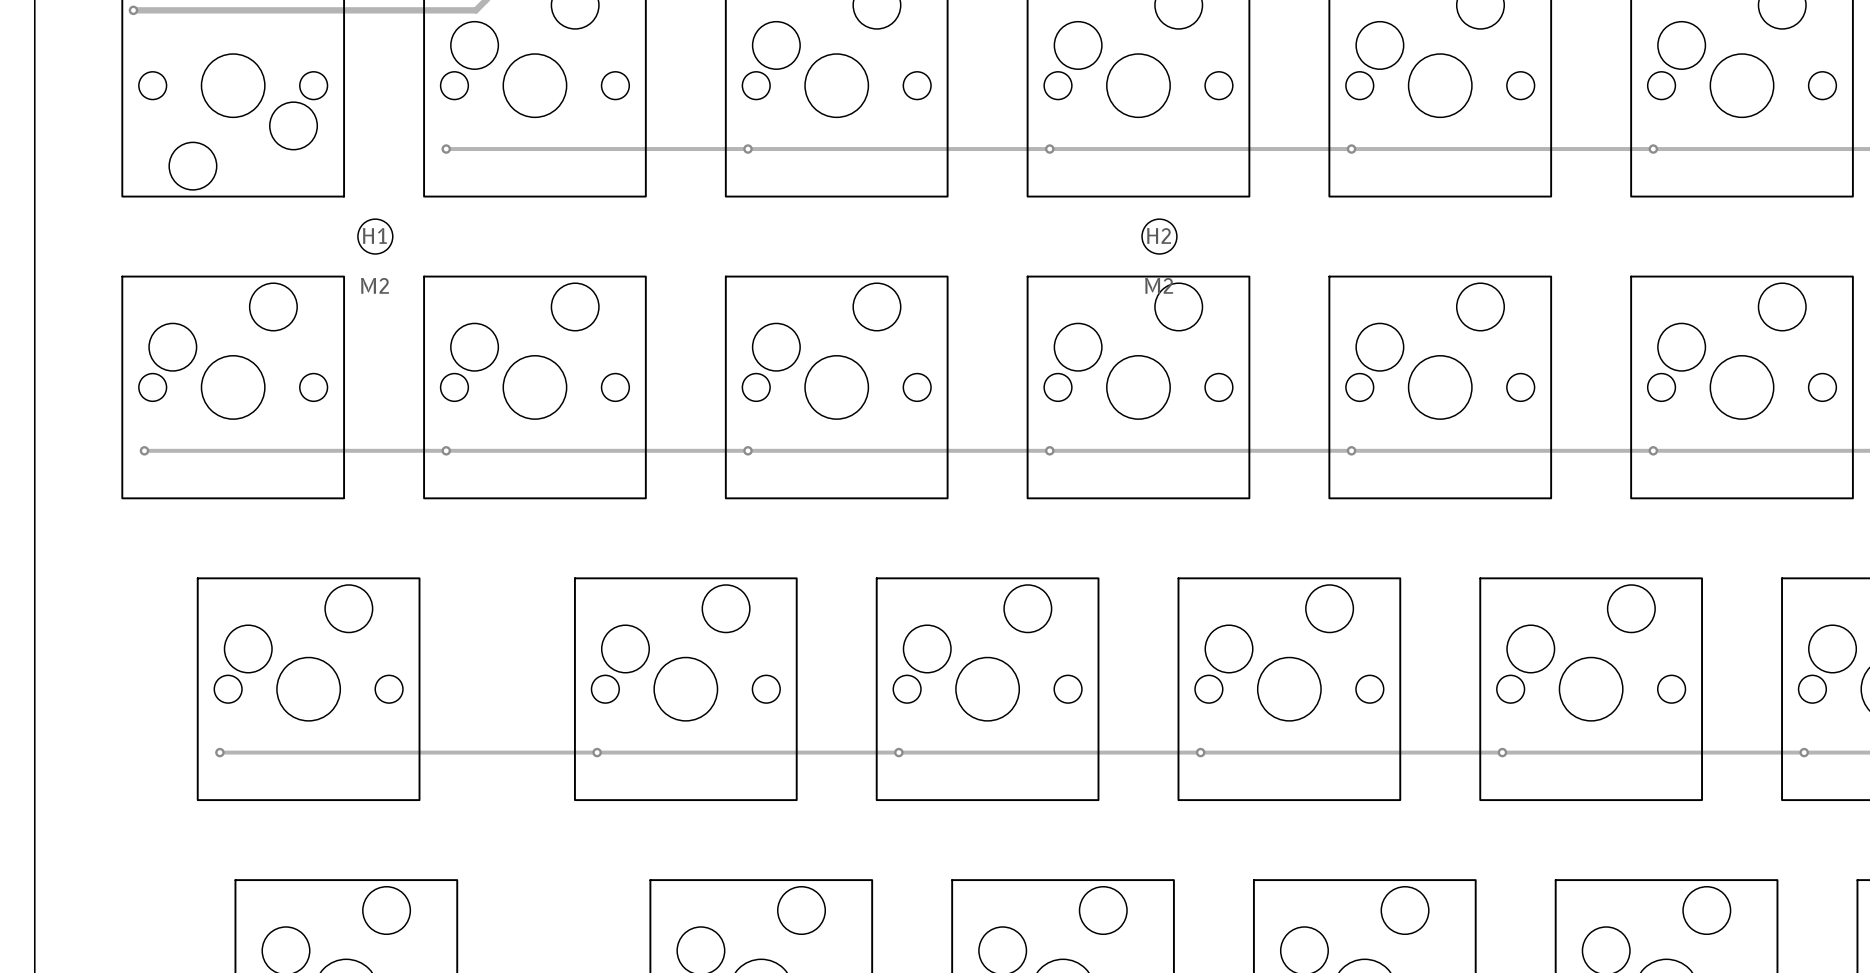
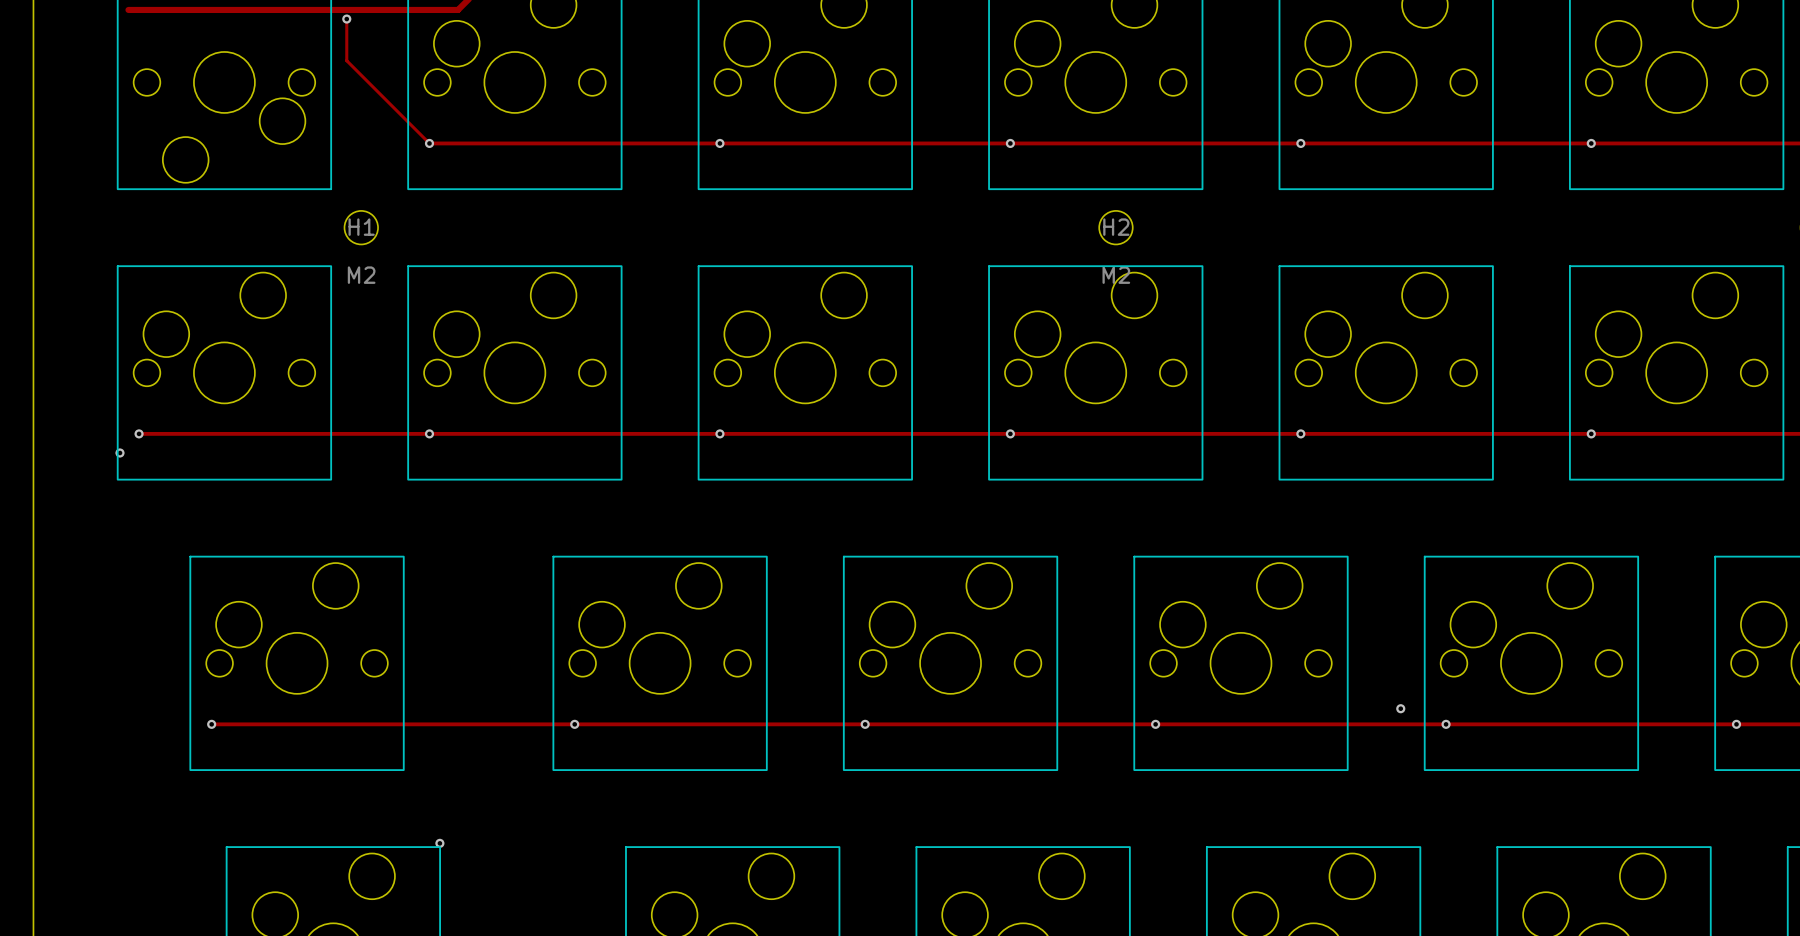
via: (133, 10) -> none
track: none -> (346, 19) (346, 60) (429, 143)
via: none -> (346, 19)
via: none -> (120, 452)
via: none -> (1400, 708)
via: none -> (439, 843)

